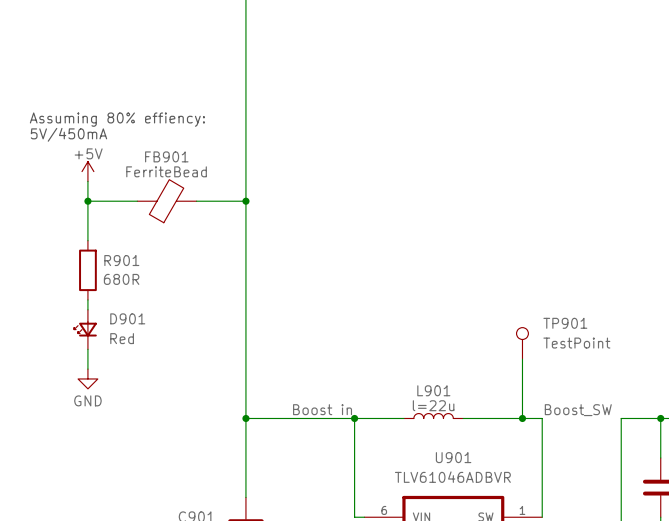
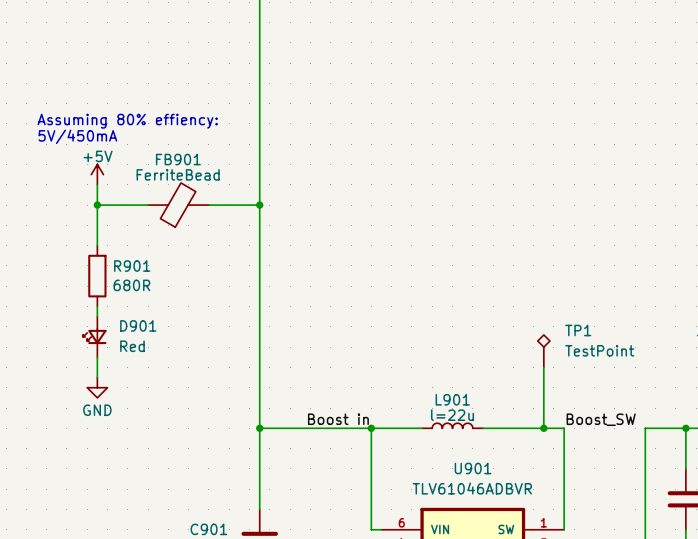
TP901: TestPoint (522, 343) -> none
TP1: none -> TestPoint (543, 351)

